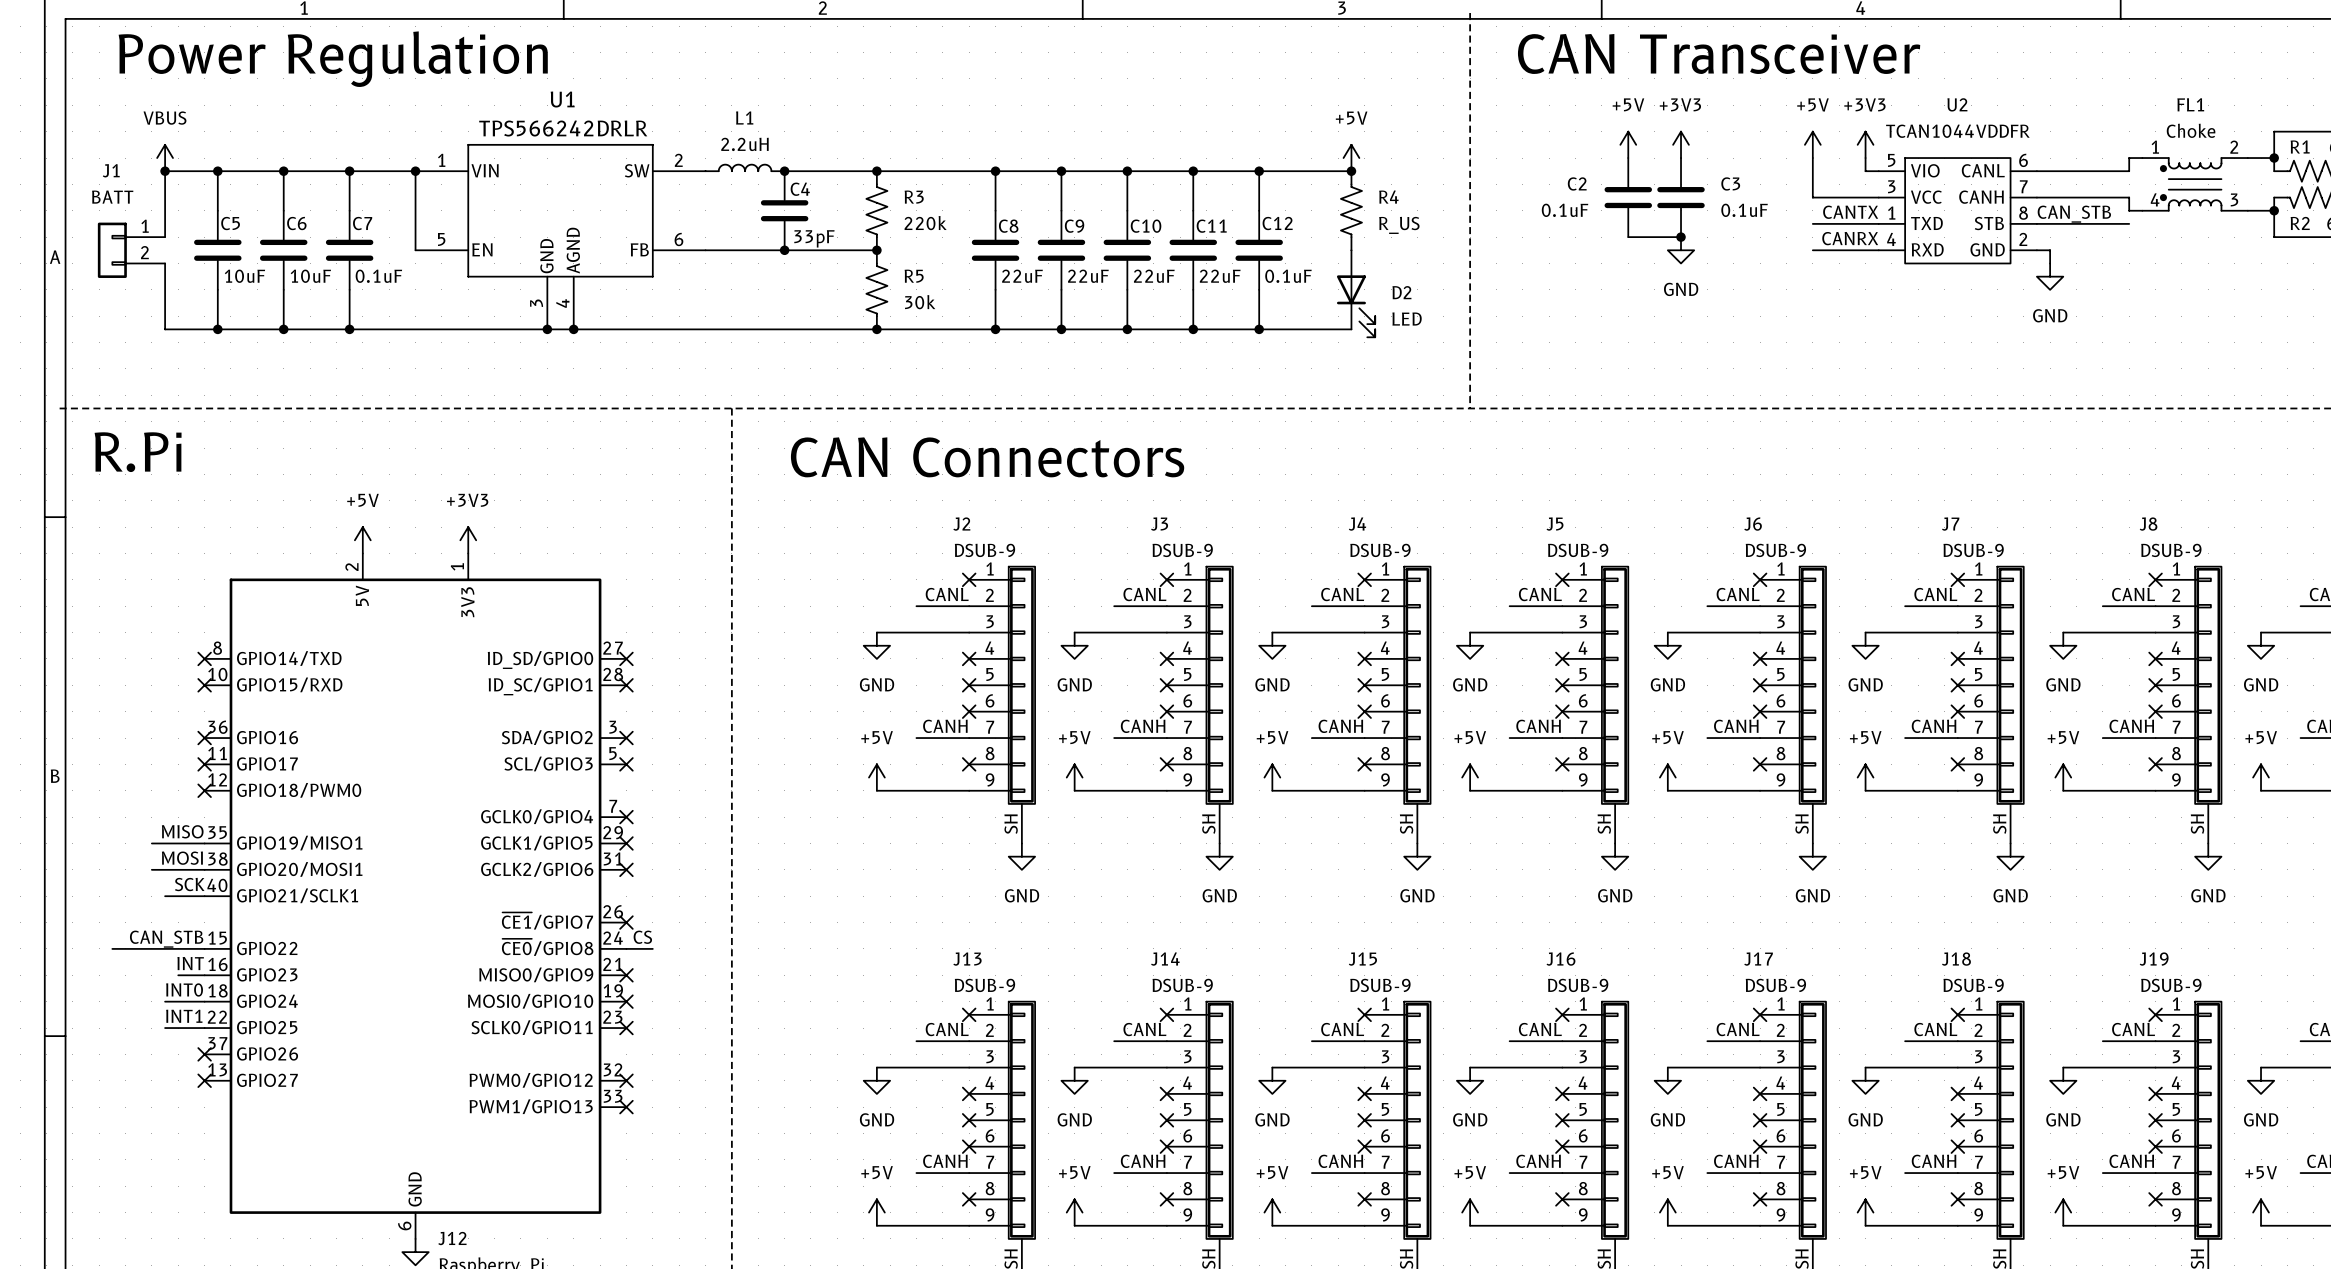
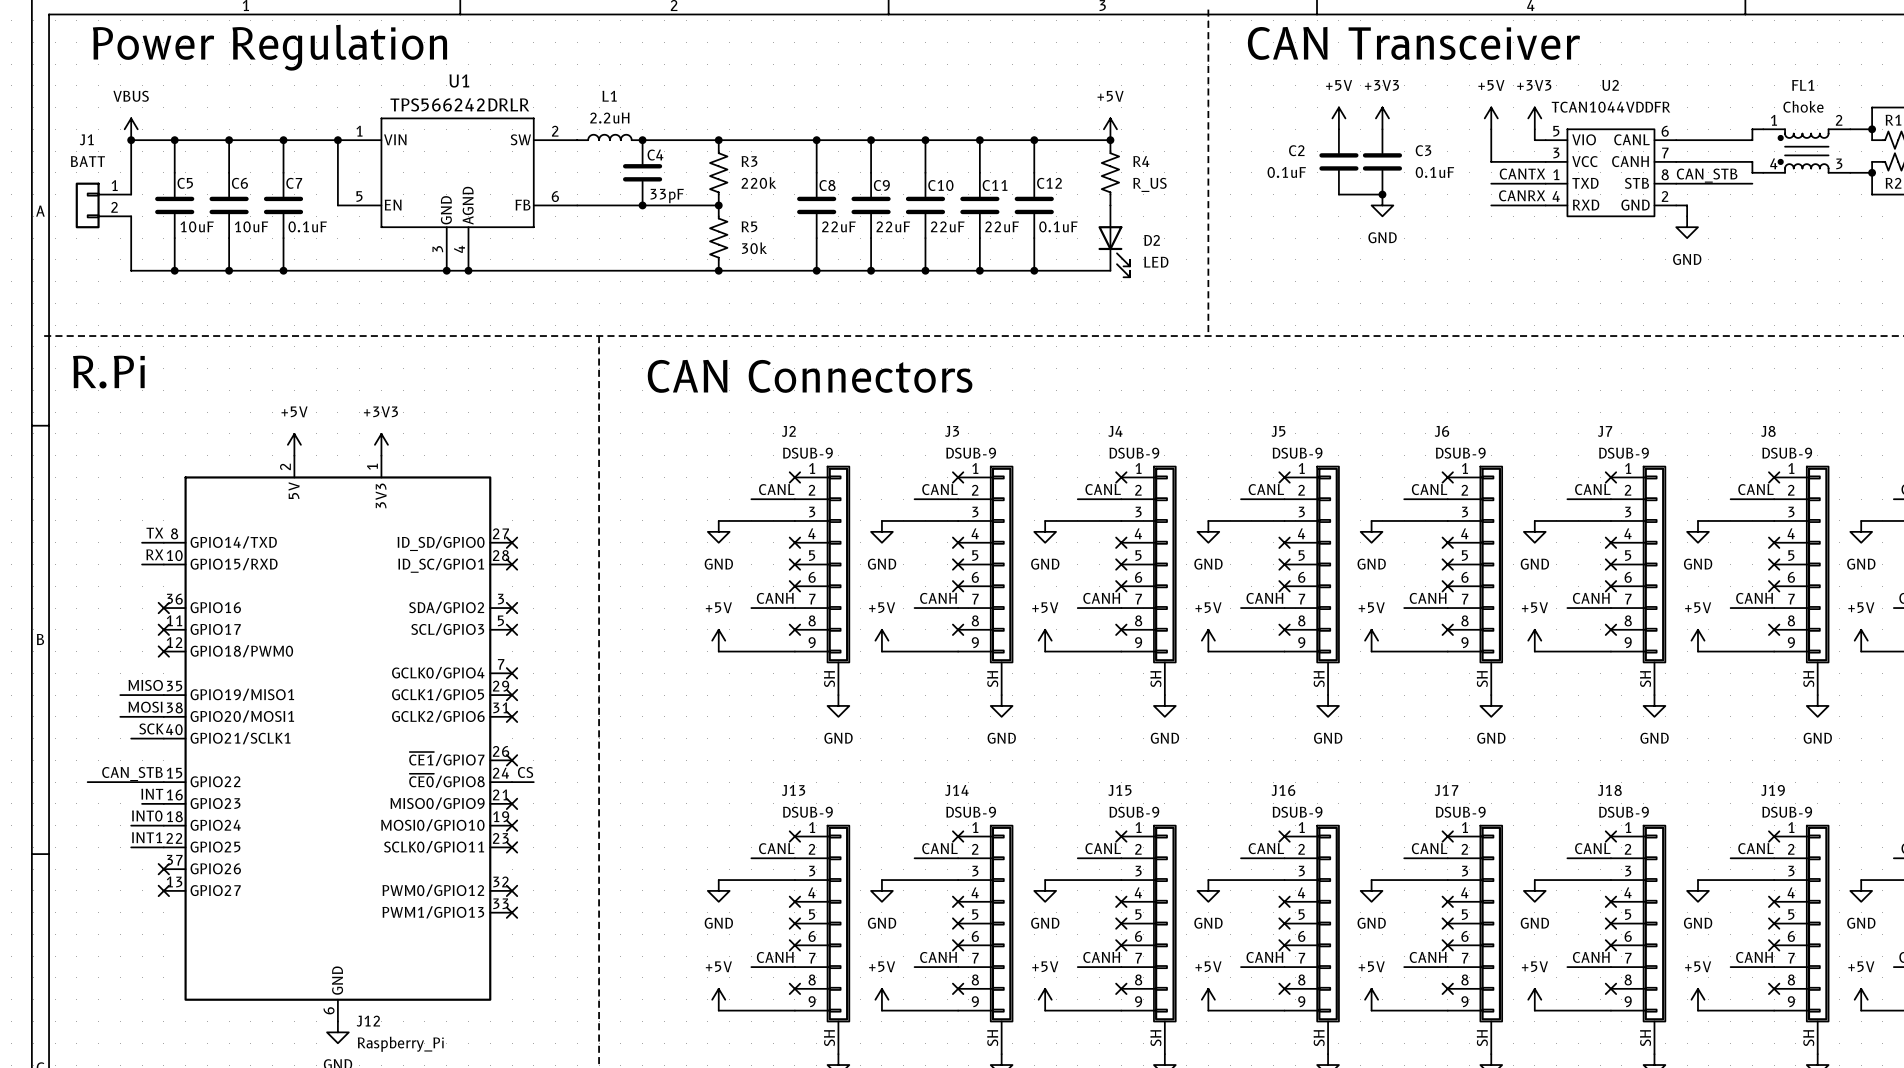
label: none -> TX (154, 533)
wire: none -> (142, 542) (163, 542)
no-connect mark: (204, 658) -> none
label: none -> RX (154, 554)
wire: none -> (142, 564) (163, 564)
no-connect mark: (204, 685) -> none

